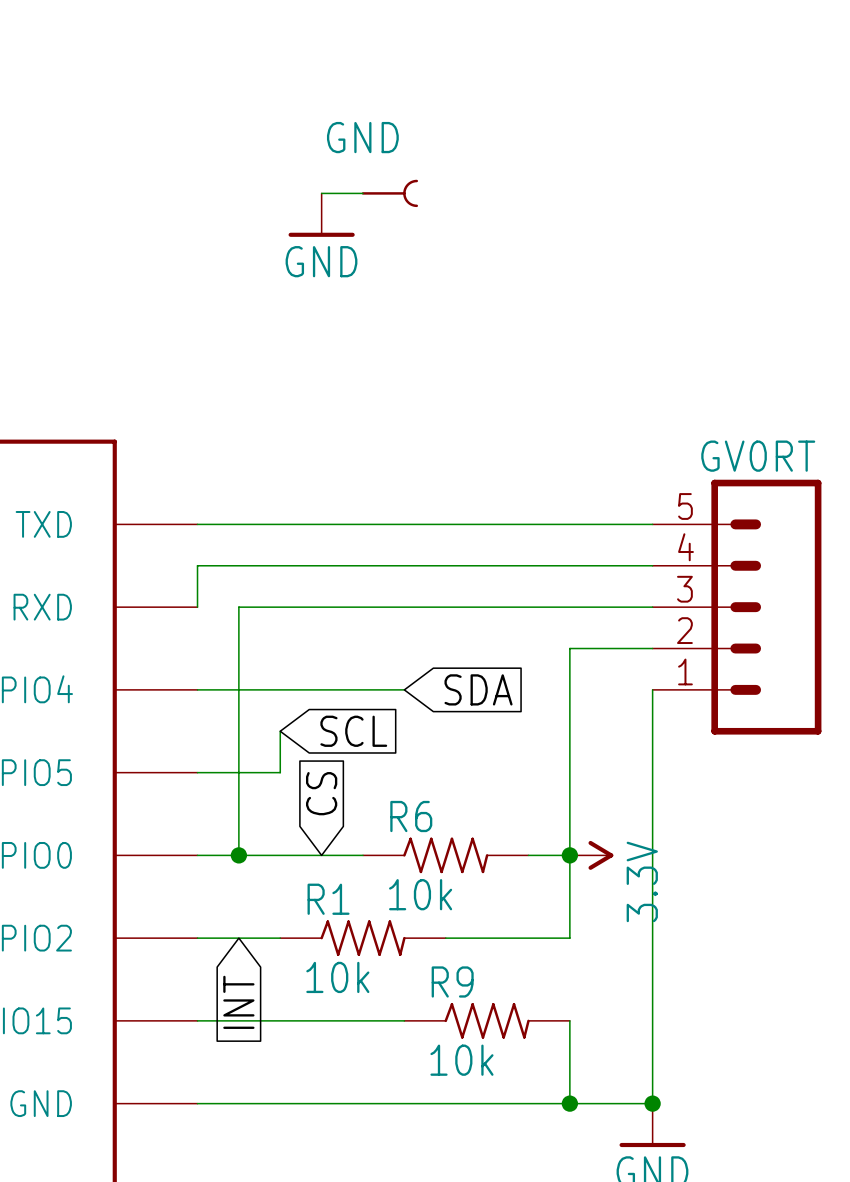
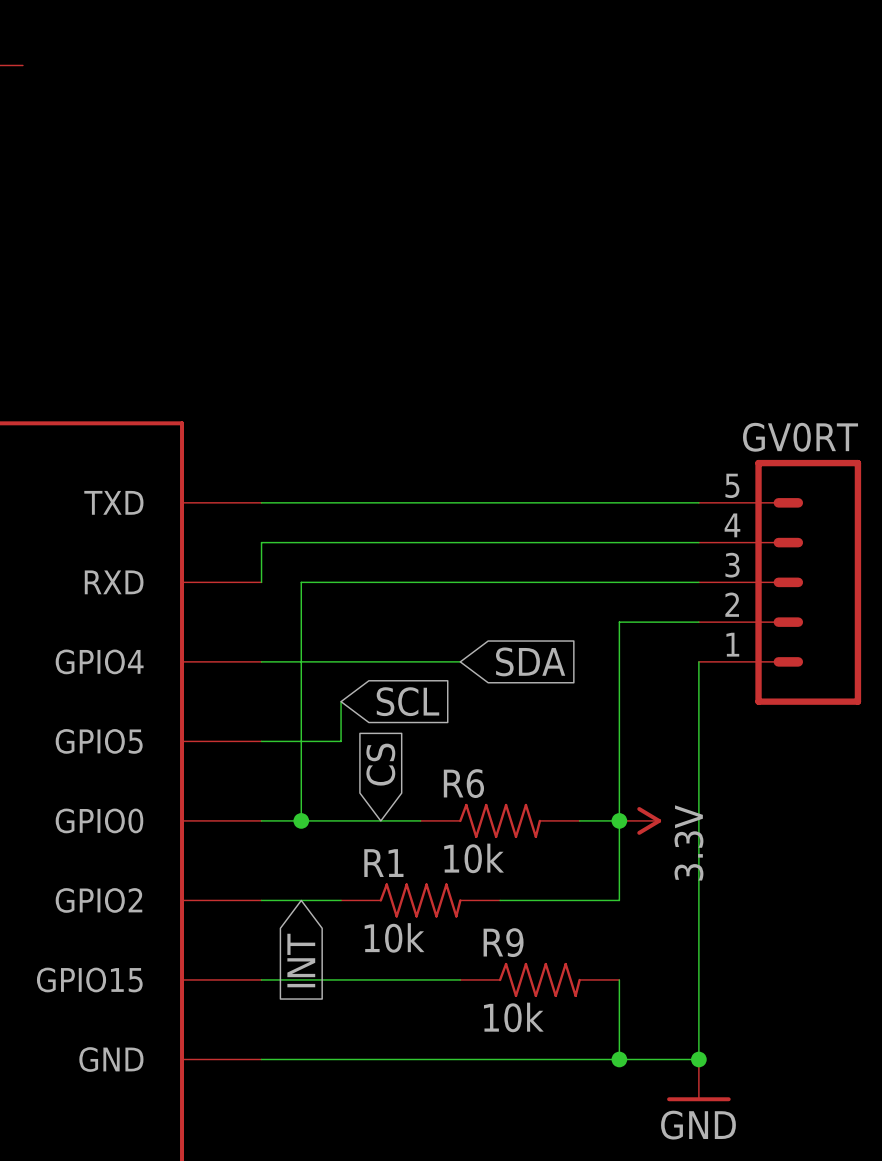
wire: (321, 193) (363, 193) -> none
GND: (389, 193) -> none
power symbol: GND (321, 215) -> none

